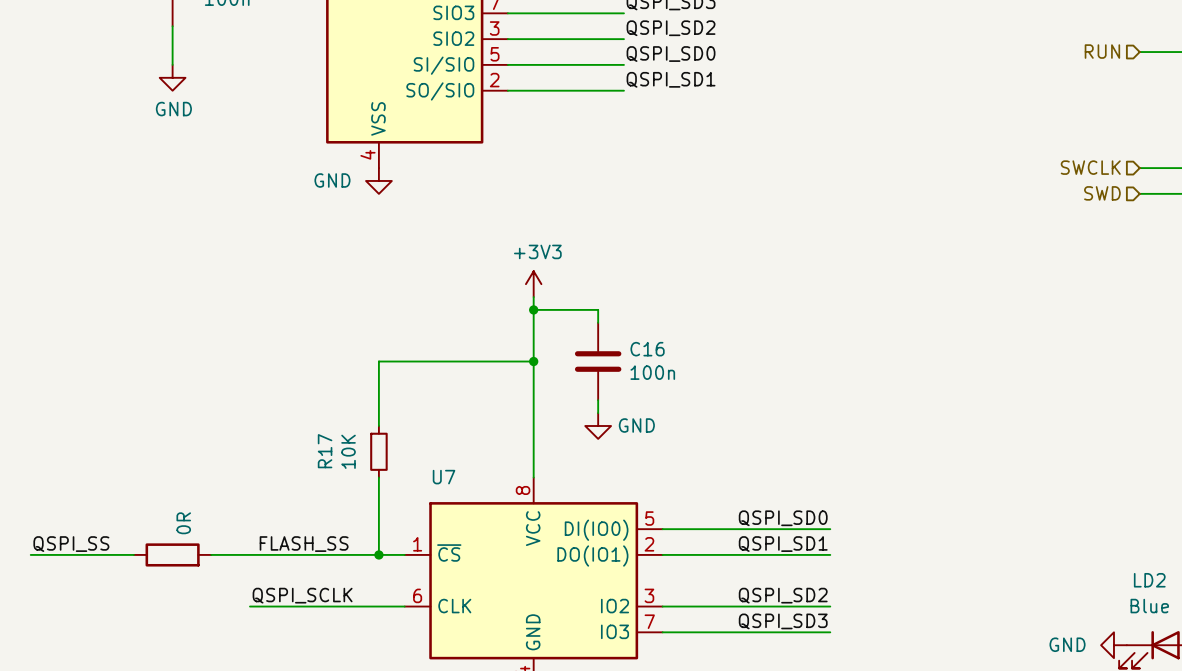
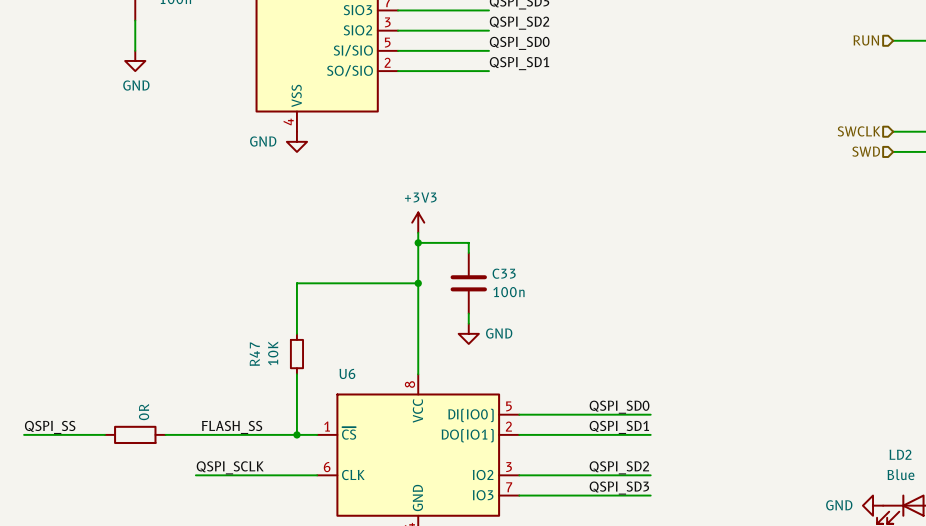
C16 name: C16 (647, 349) -> C33 (504, 273)
R17 name: R17 (325, 451) -> R47 (254, 354)
U7 name: U7 (444, 477) -> U6 (347, 373)

